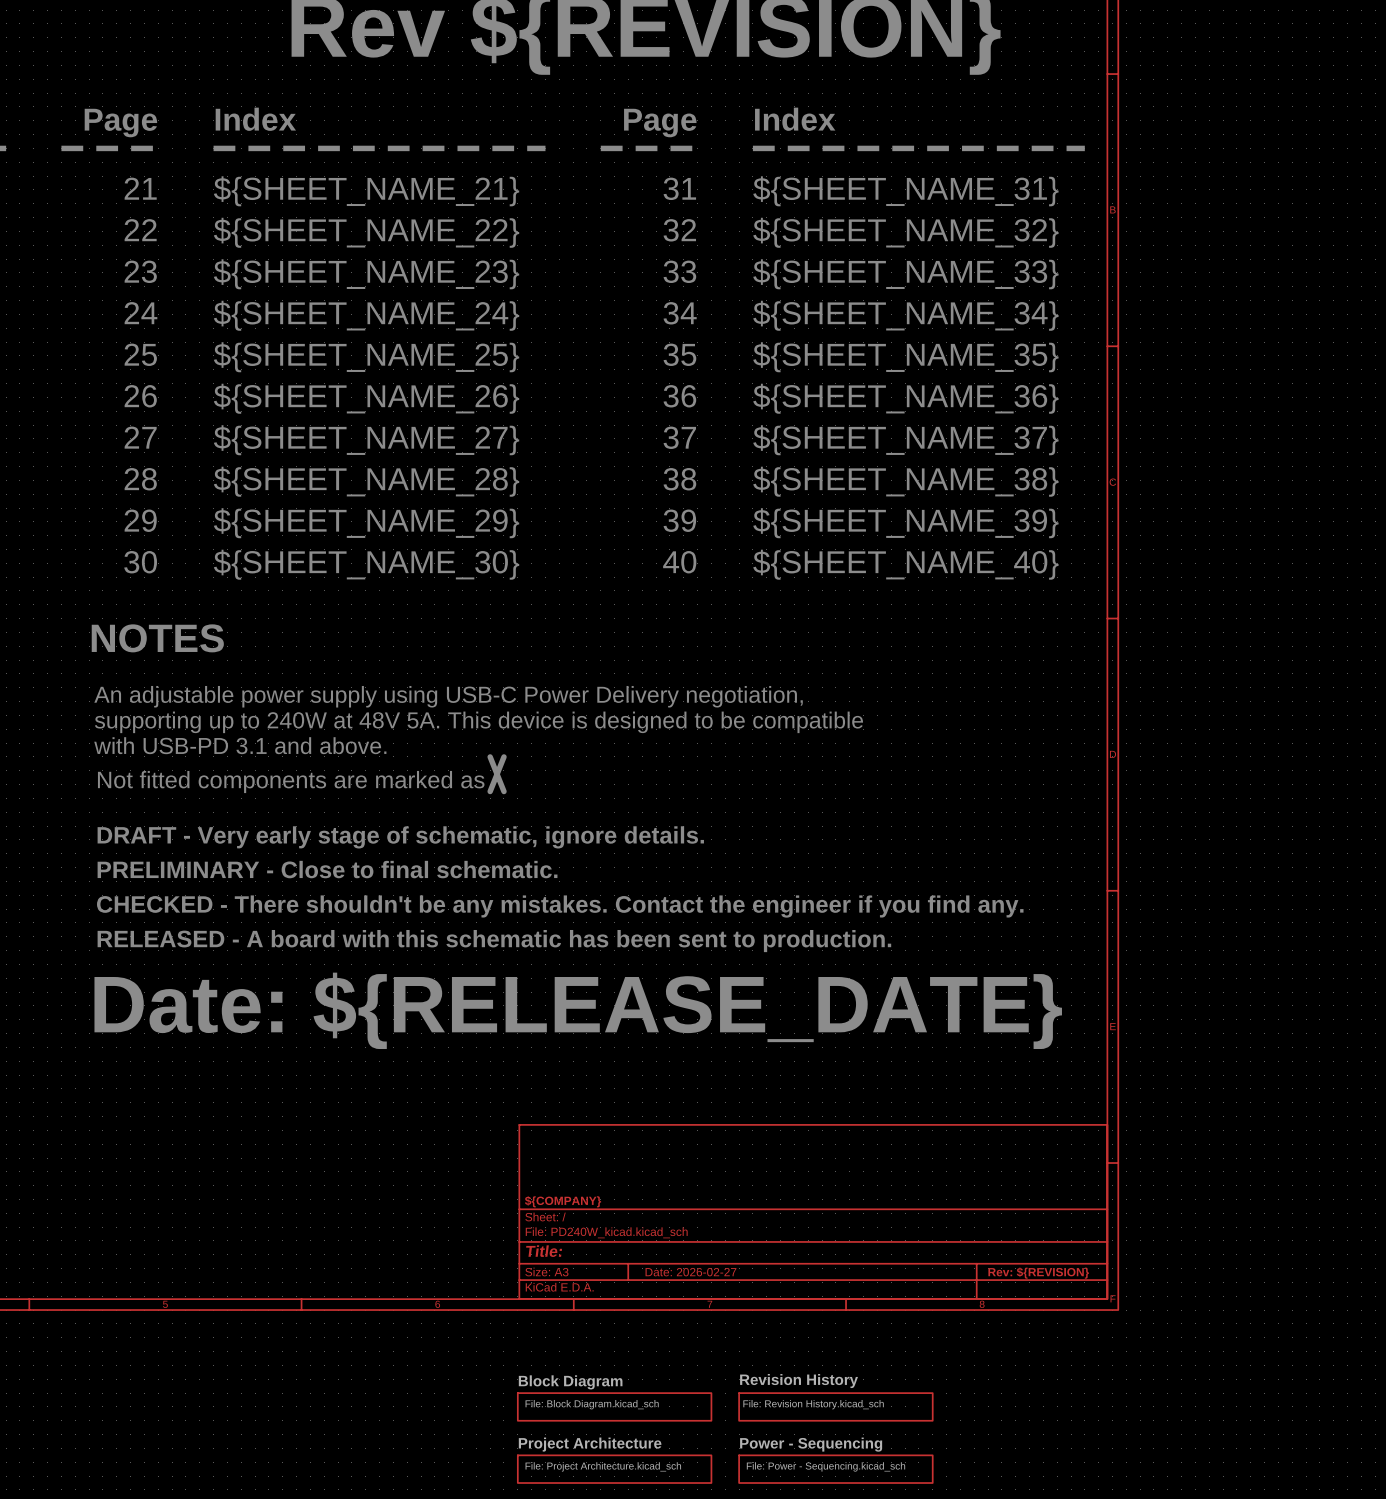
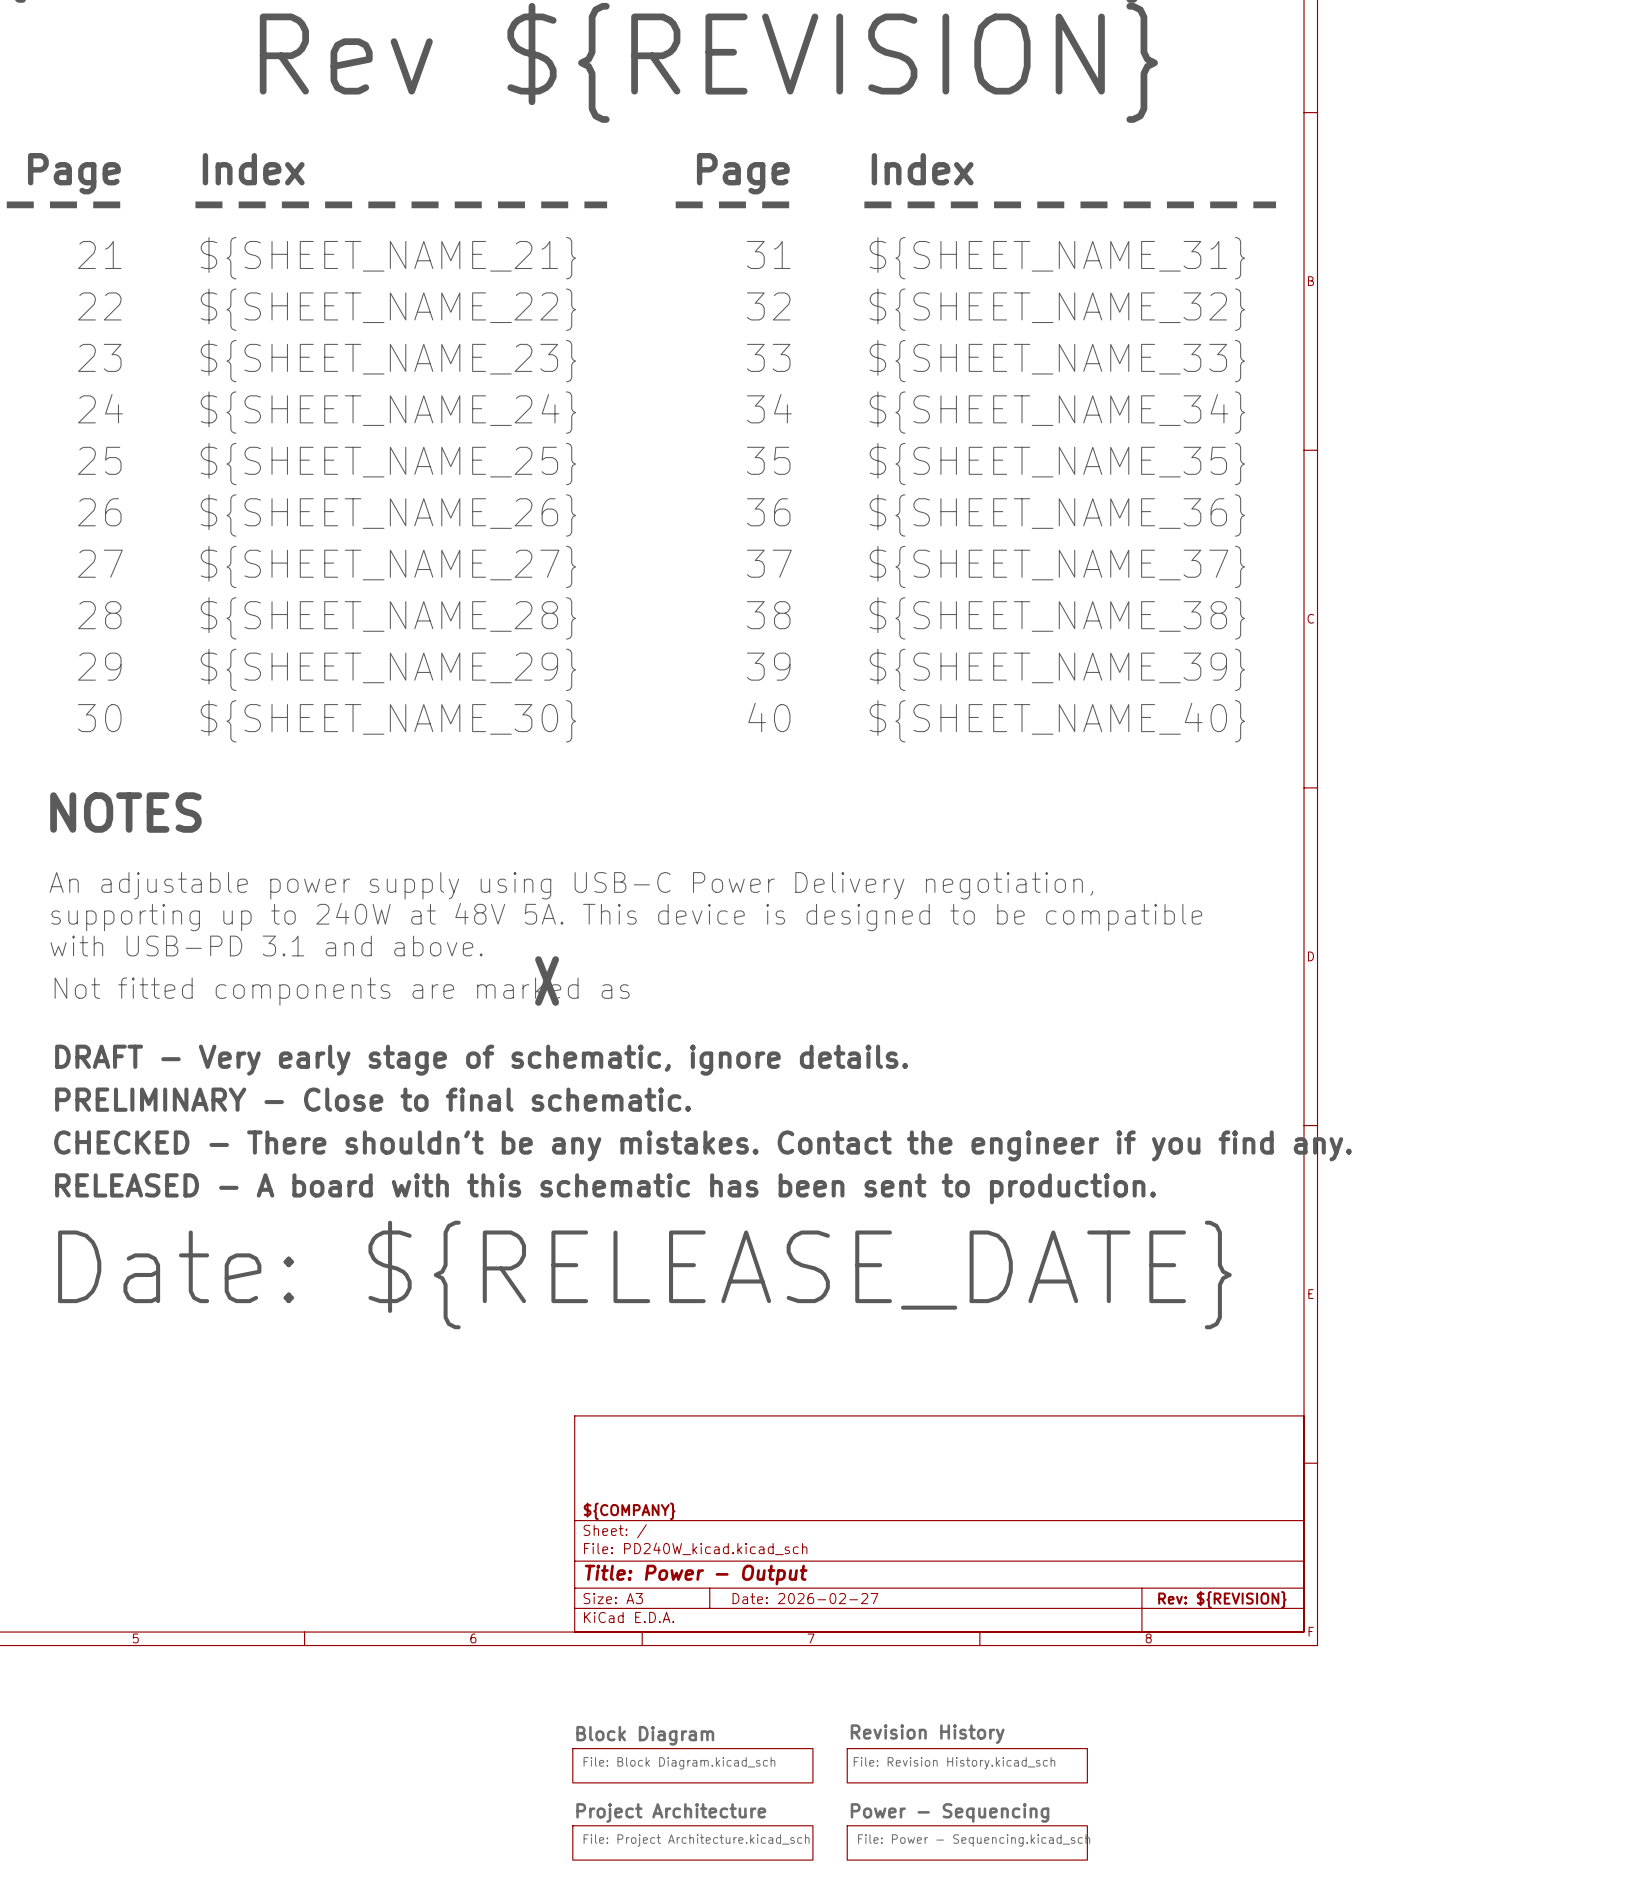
title block: Title: (544, 1251) -> Title: Power - Output (696, 1575)

